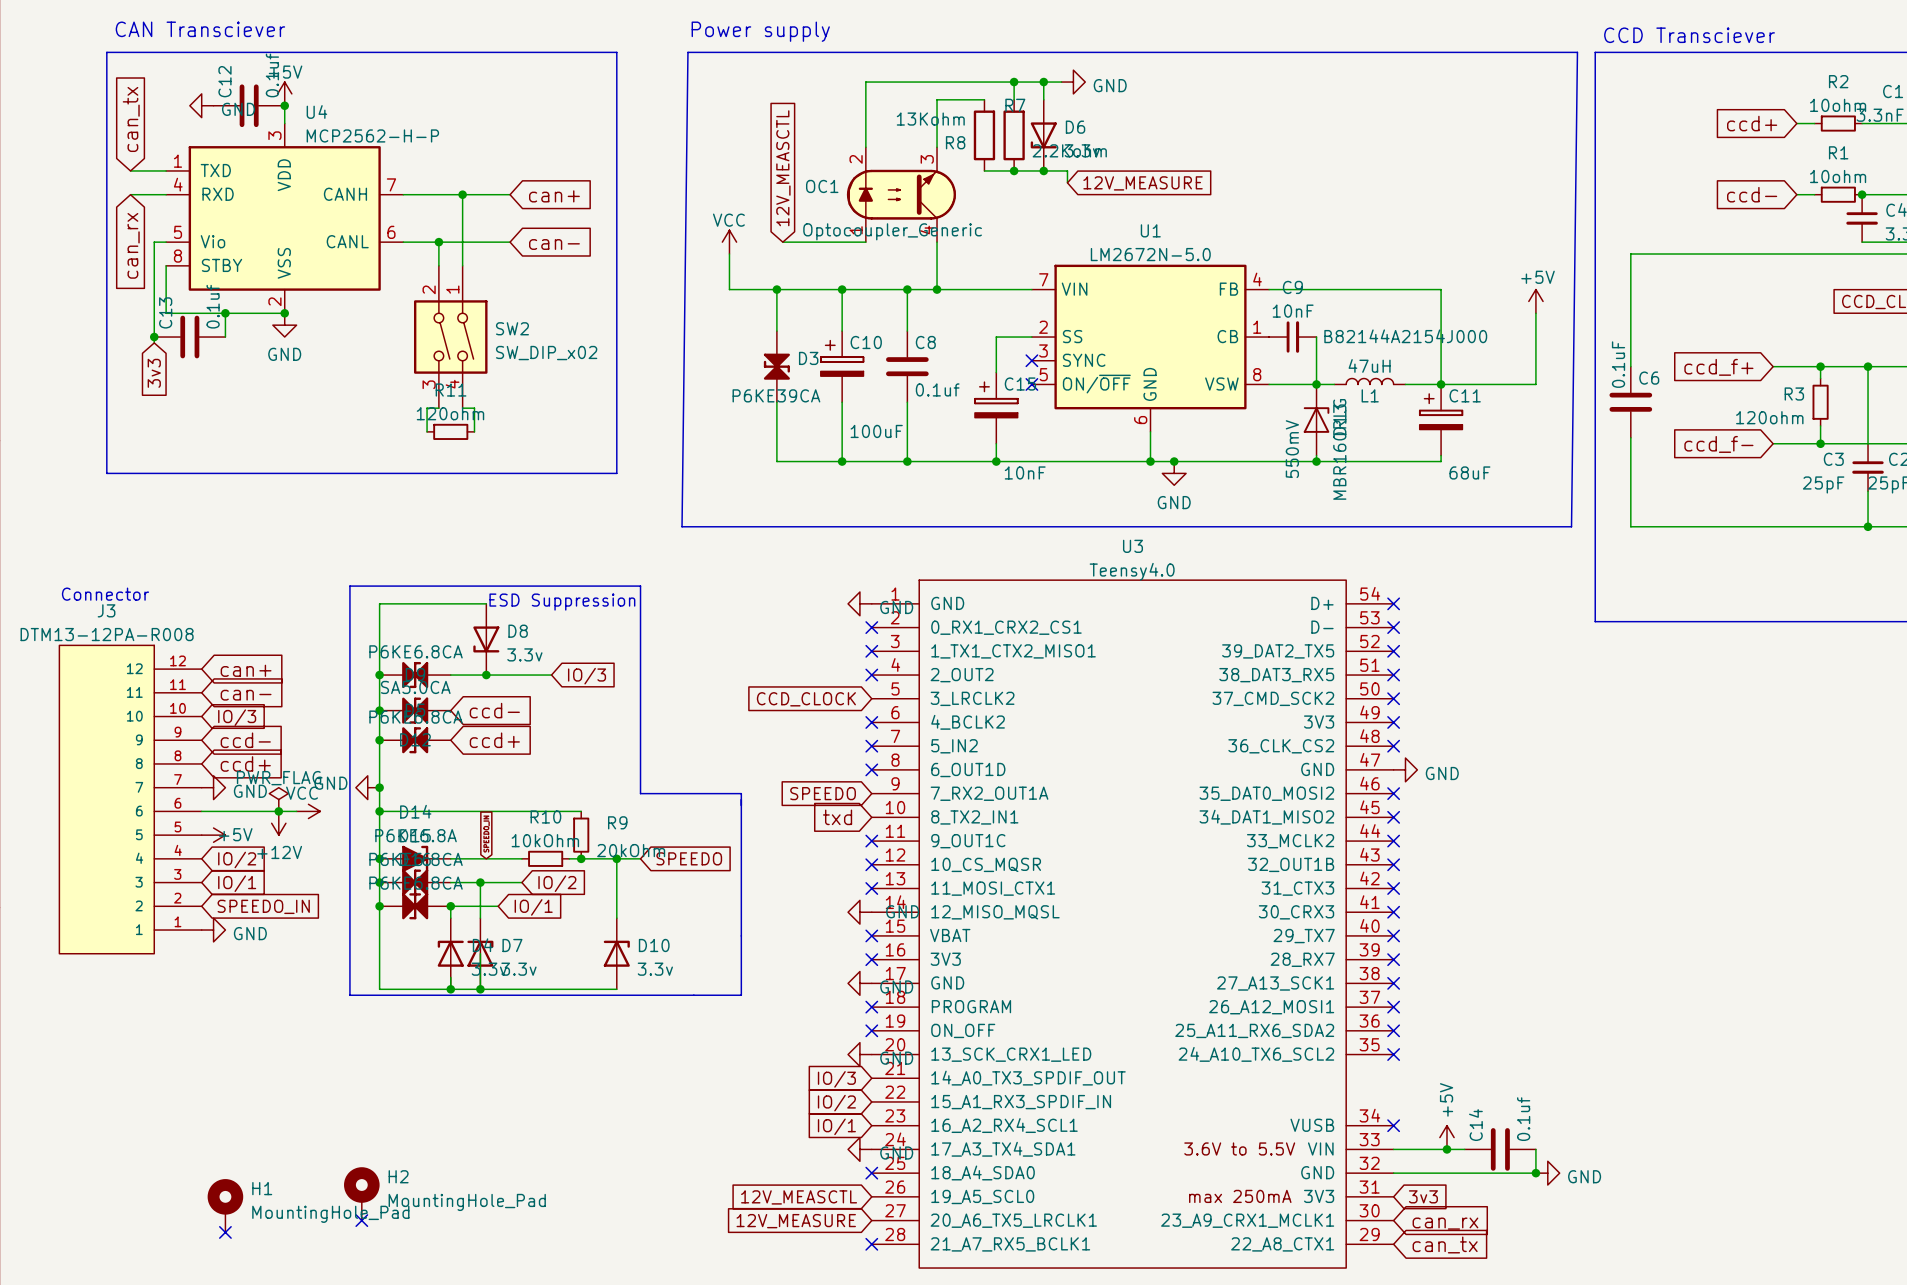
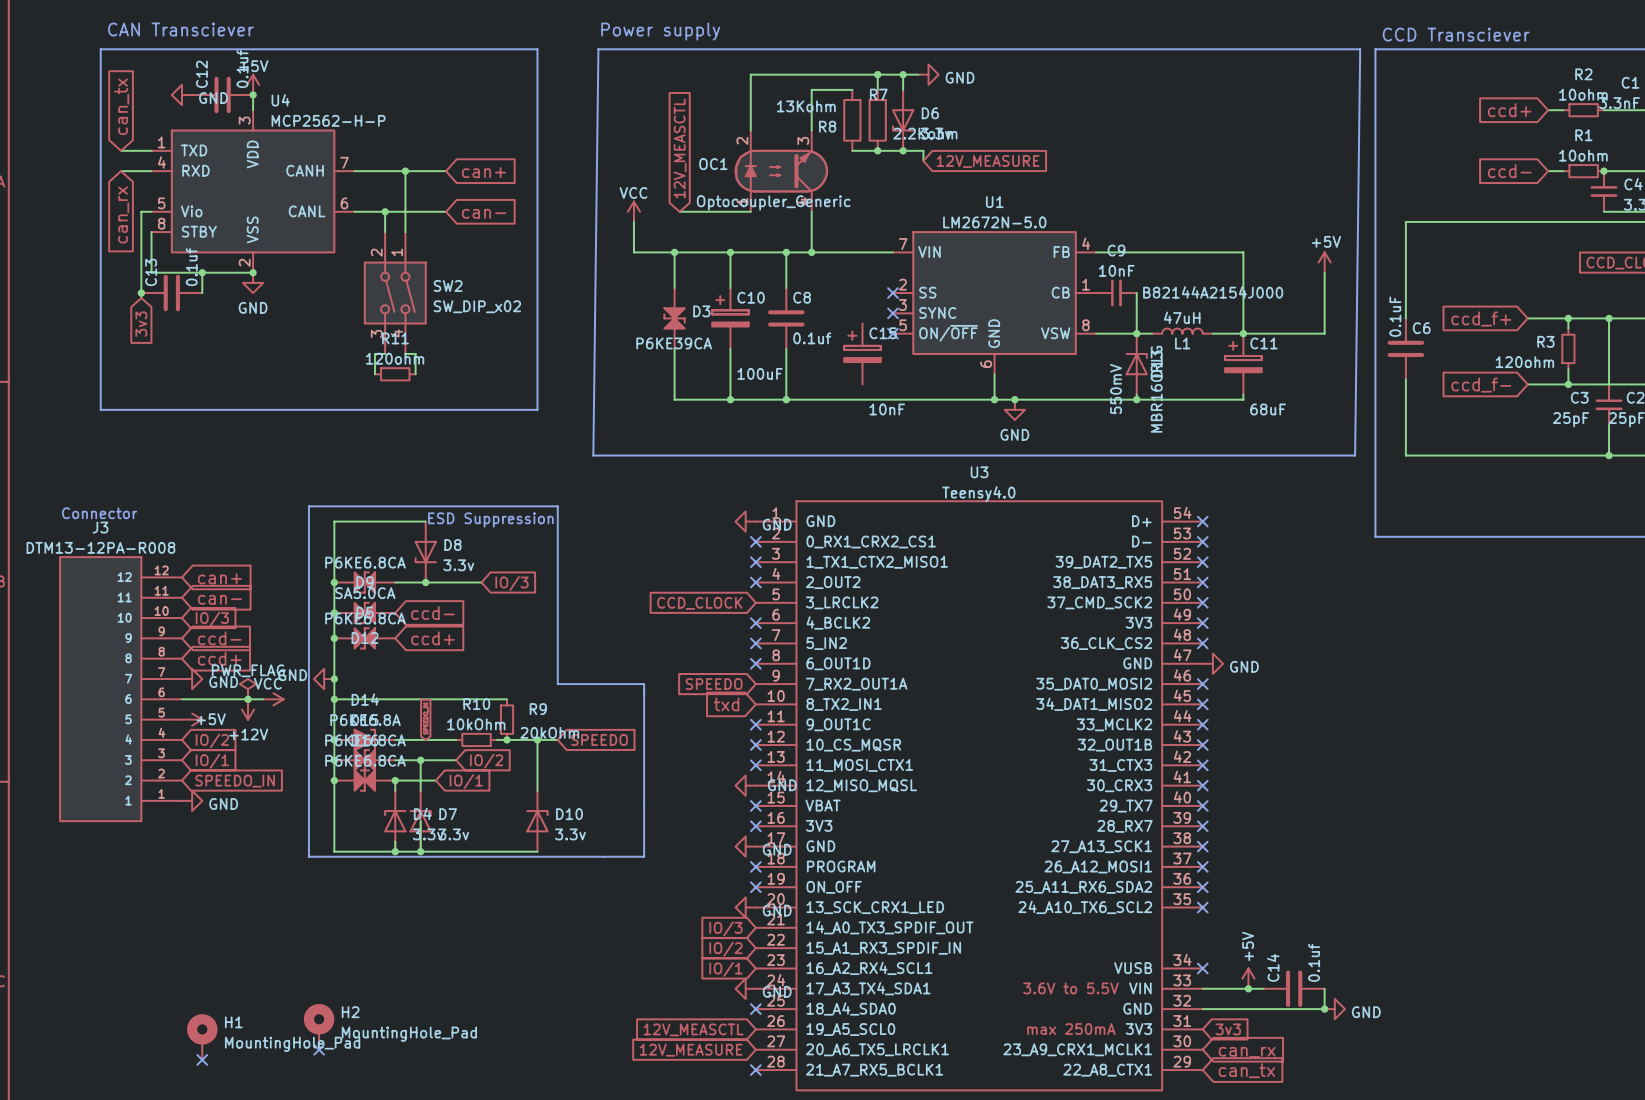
wire: (1031, 337) (996, 337) (996, 372) -> none
no-connect mark: none -> (892, 293)
wire: (996, 443) (996, 461) -> none
junction: (996, 461) -> none

